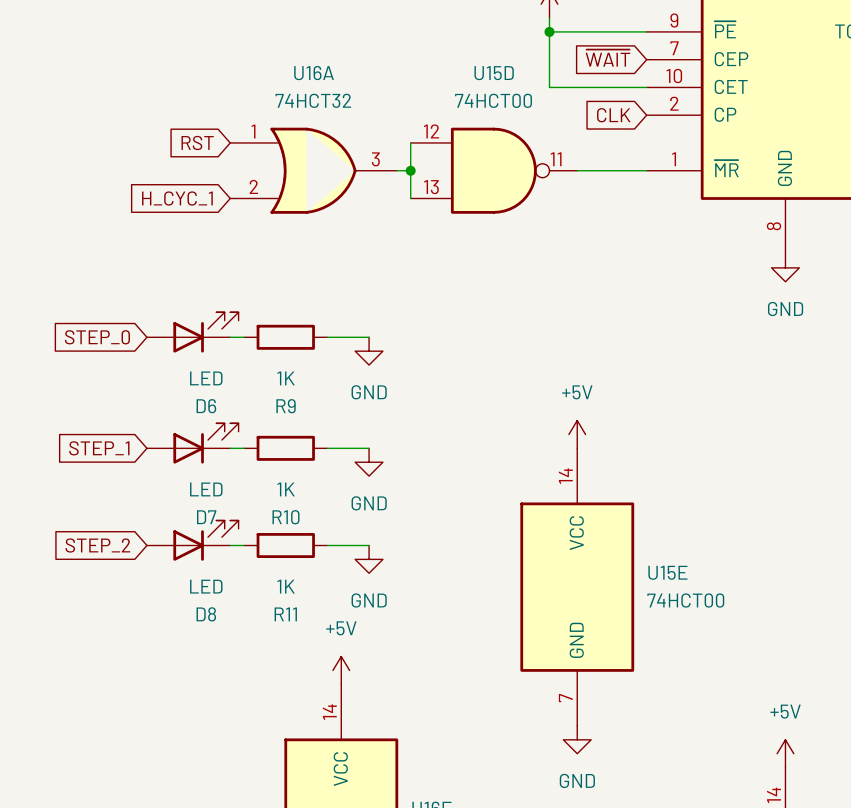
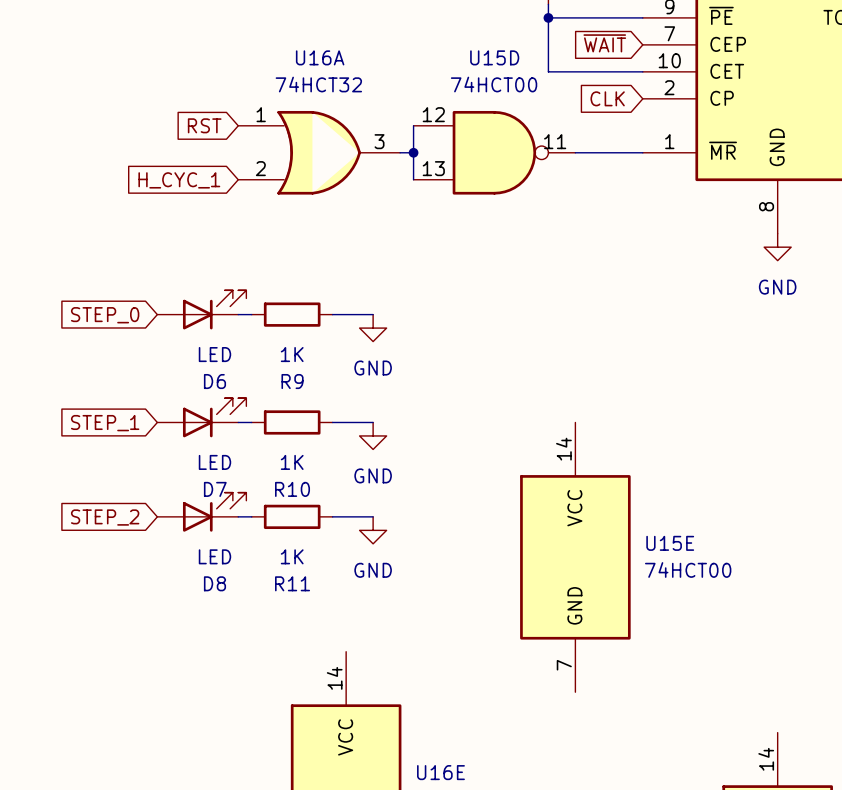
power symbol: +5V (577, 434) -> none
power symbol: +5V (341, 670) -> none
power symbol: GND (577, 739) -> none
power symbol: +5V (785, 753) -> none

